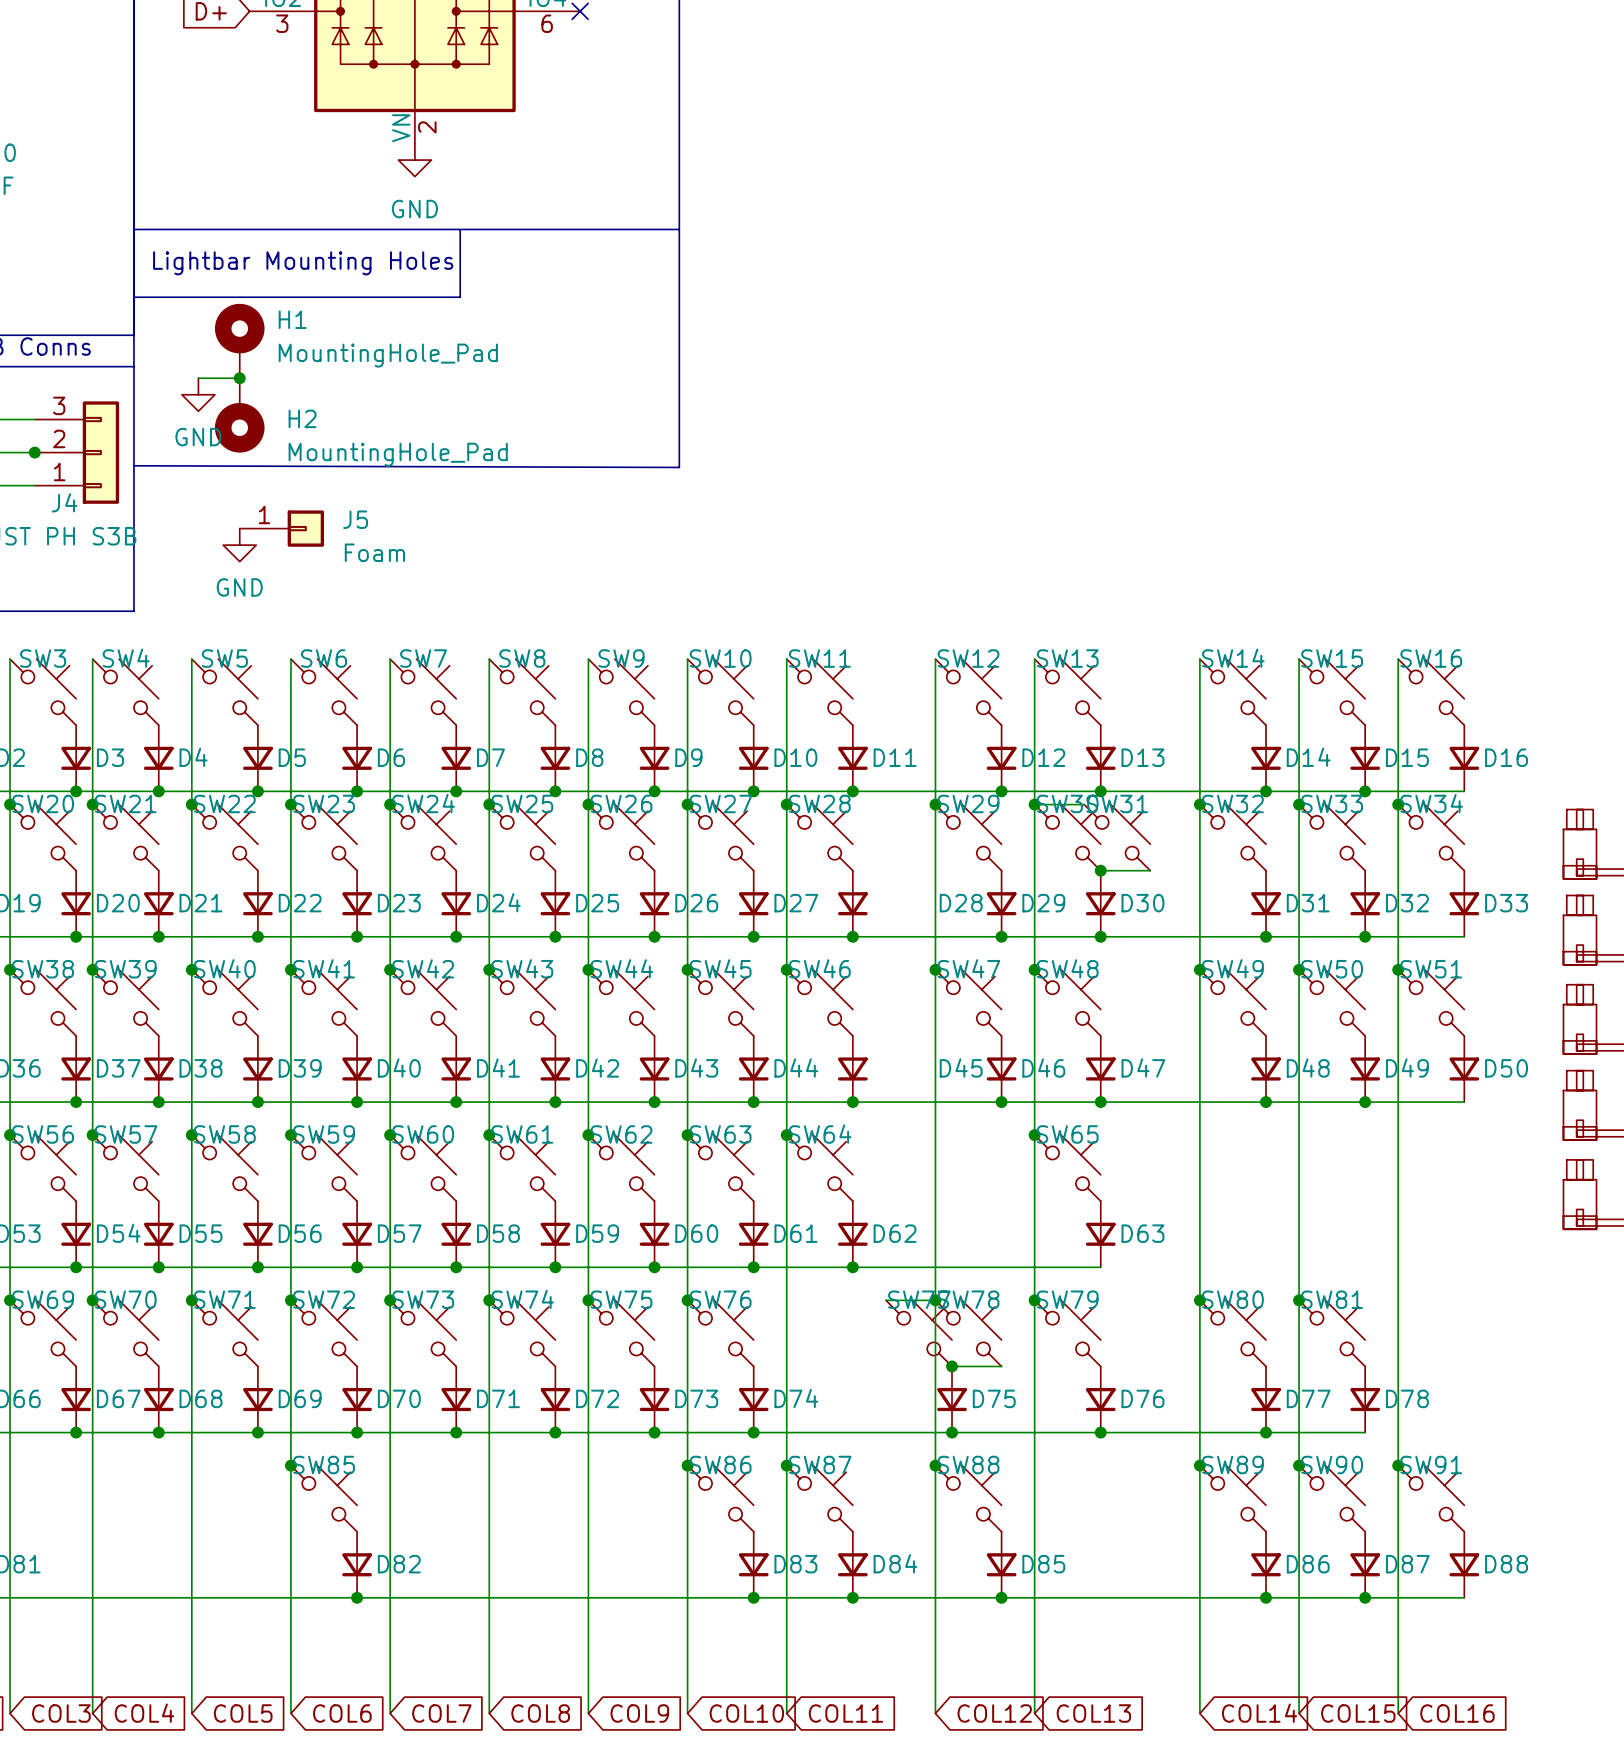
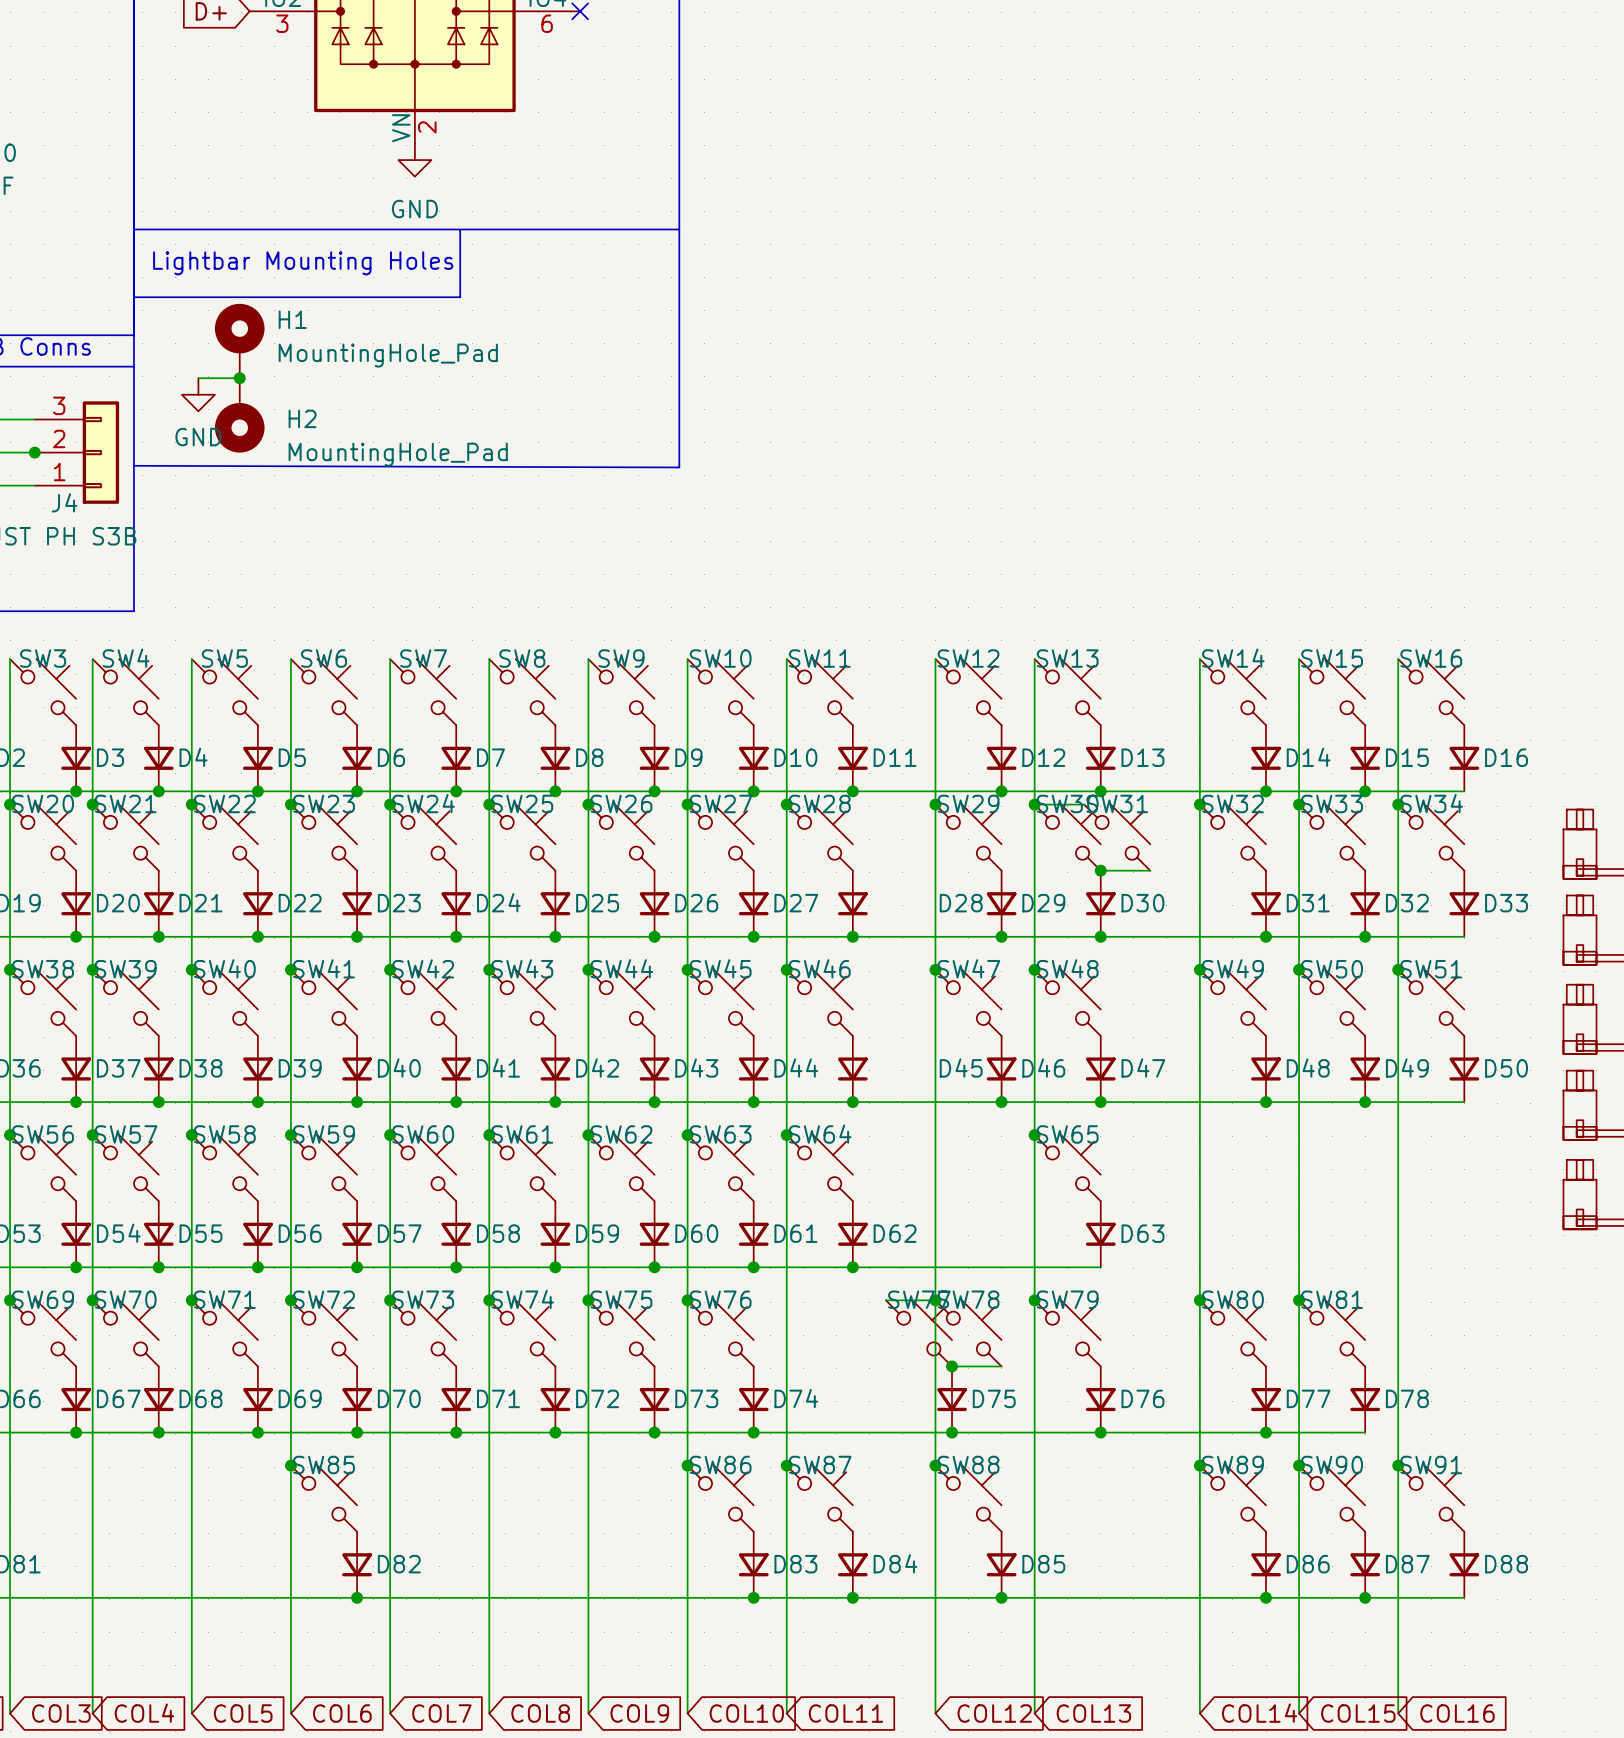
J5: Foam (281, 528) -> none
power symbol: GND (239, 545) -> none

